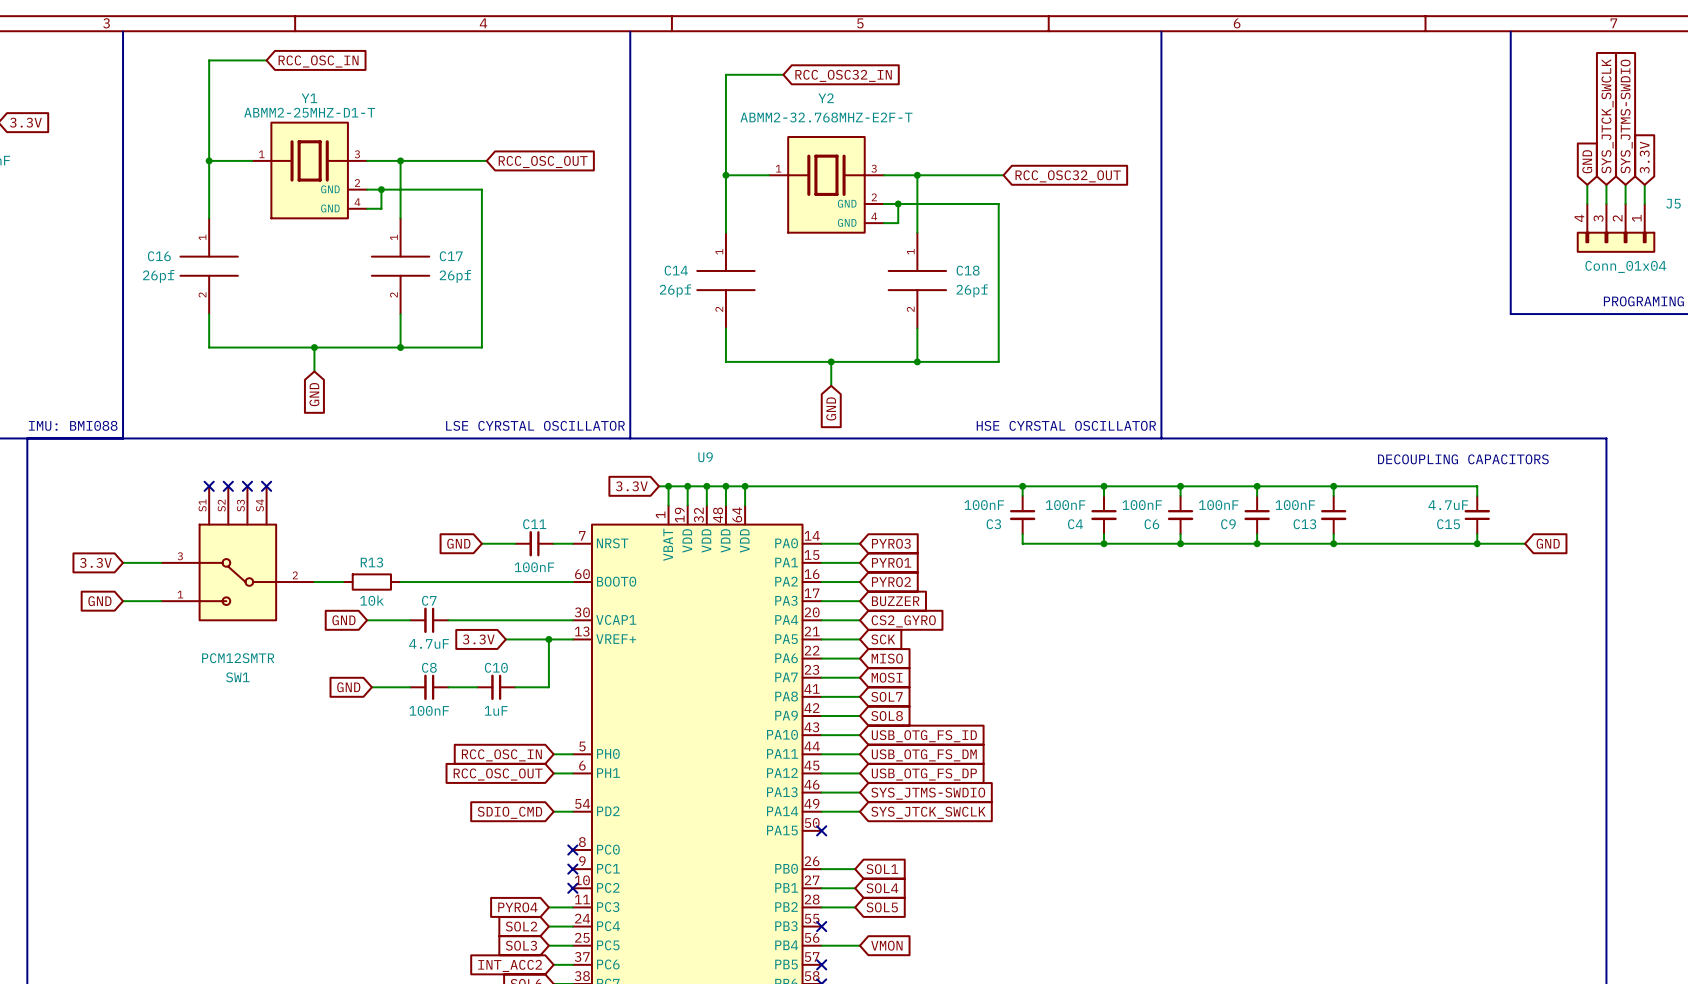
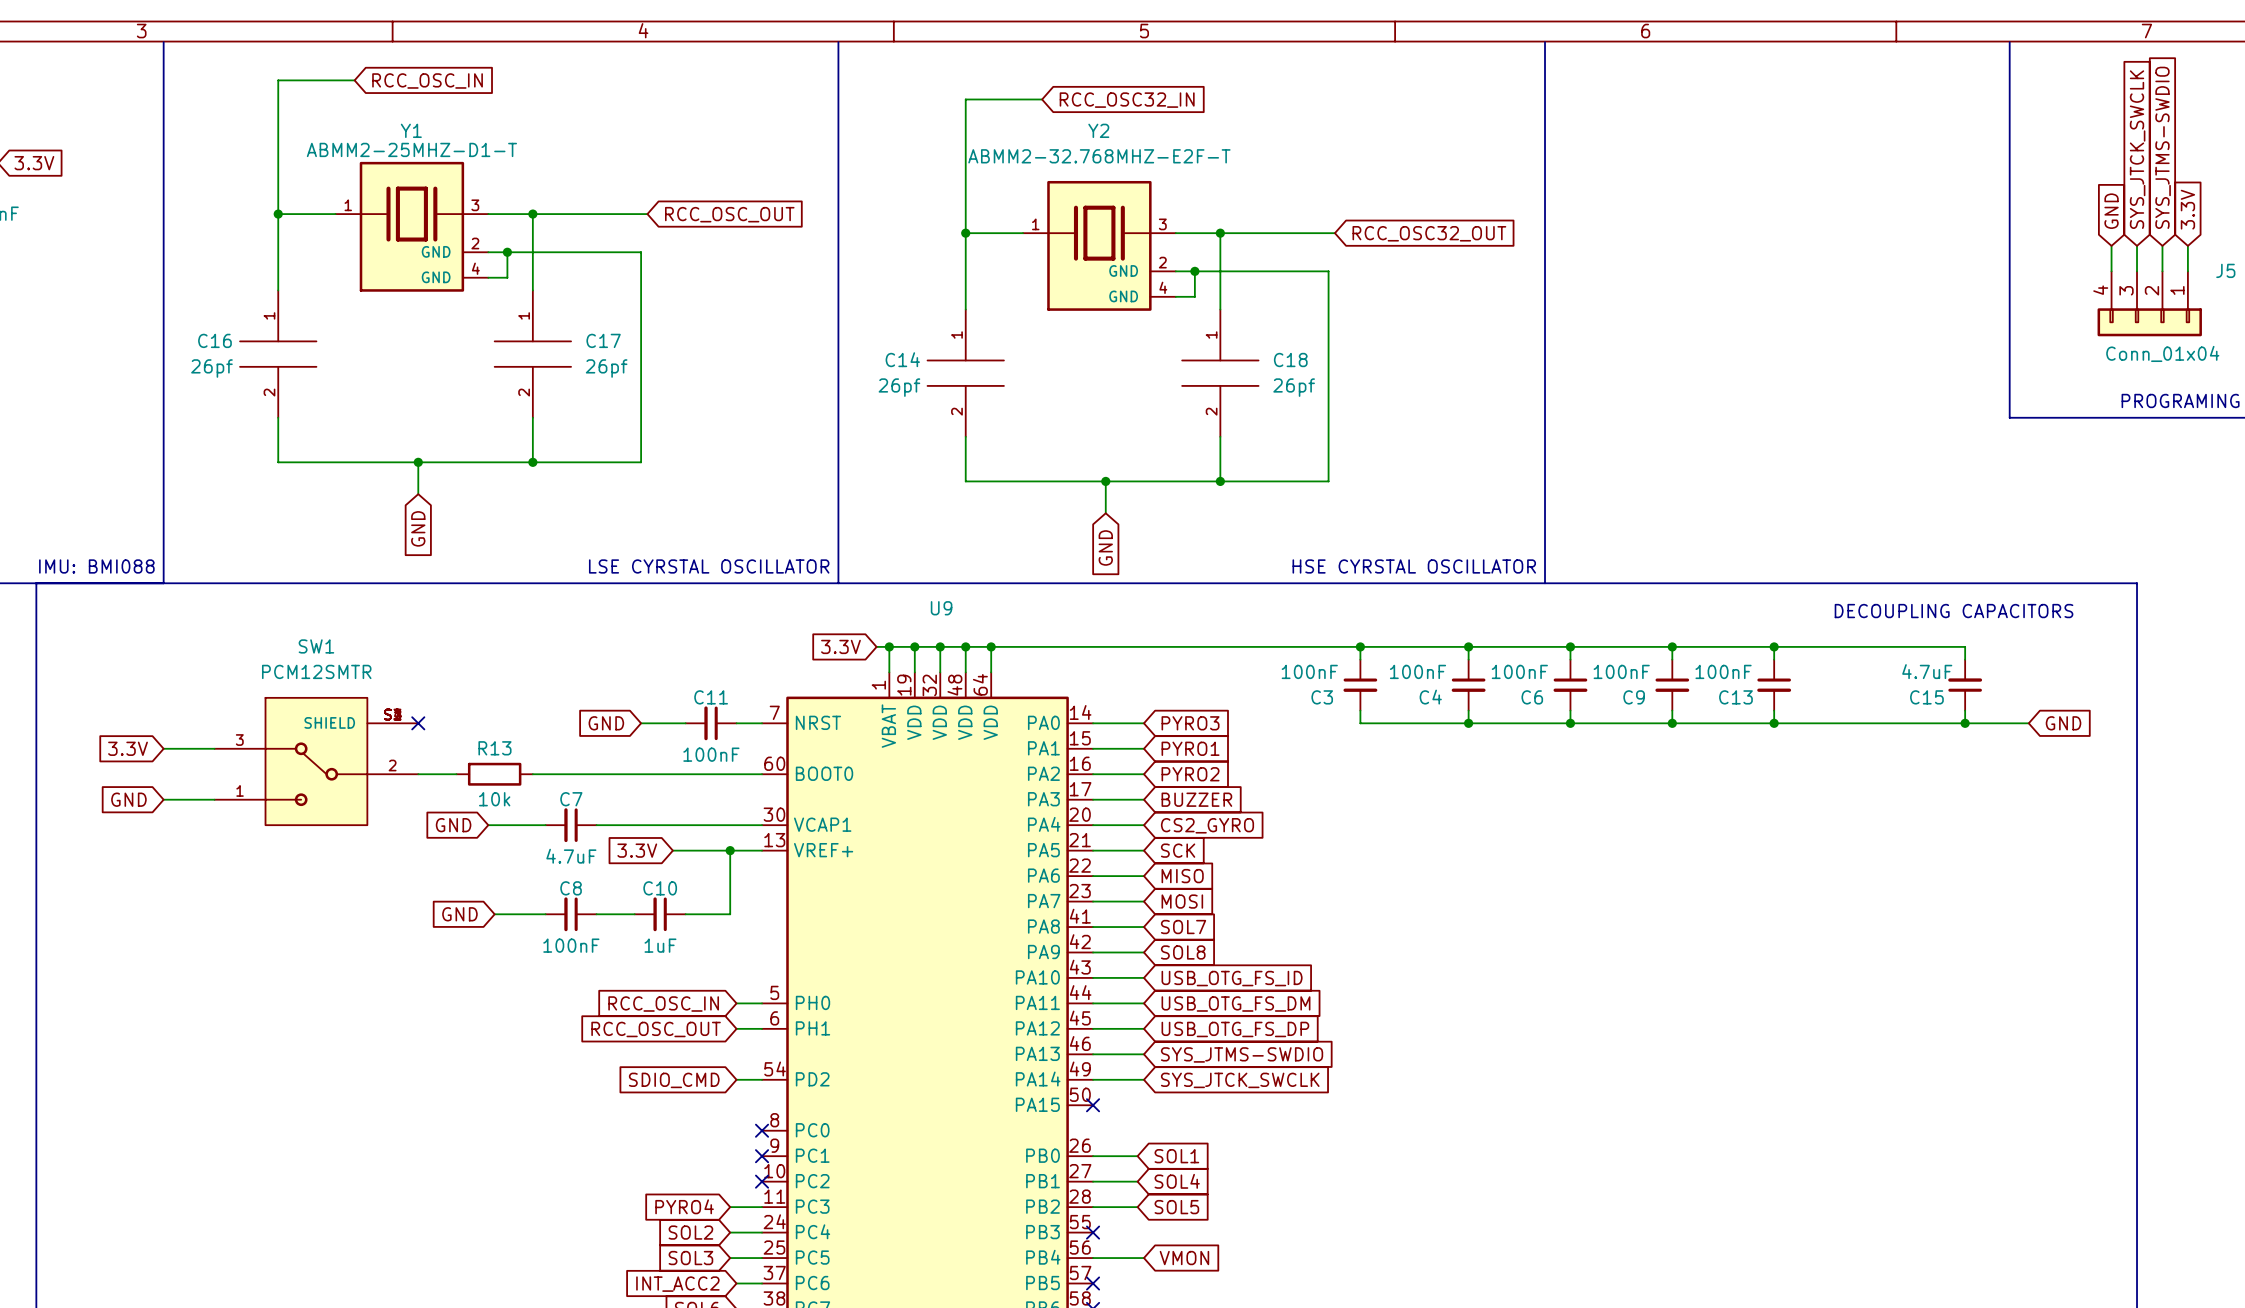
SW1 symbol: [161, 486, 315, 621] -> [214, 697, 419, 826]
no-connect mark: (209, 486) -> none
no-connect mark: (228, 486) -> none
no-connect mark: (247, 486) -> none
no-connect mark: (266, 486) -> none
no-connect mark: none -> (418, 723)
SW1 value position: PCM12SMTR (238, 658) -> PCM12SMTR (316, 671)
SW1 name position: SW1 (237, 677) -> SW1 (316, 646)

